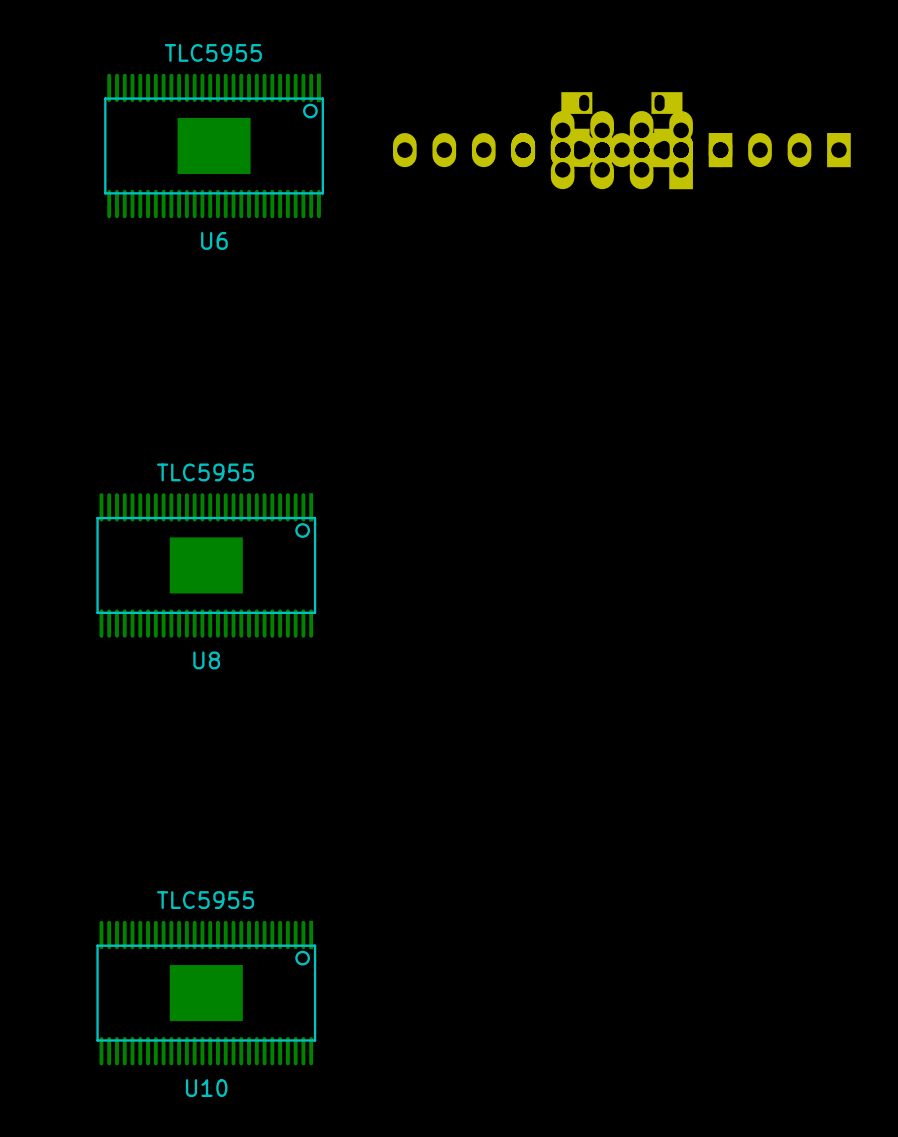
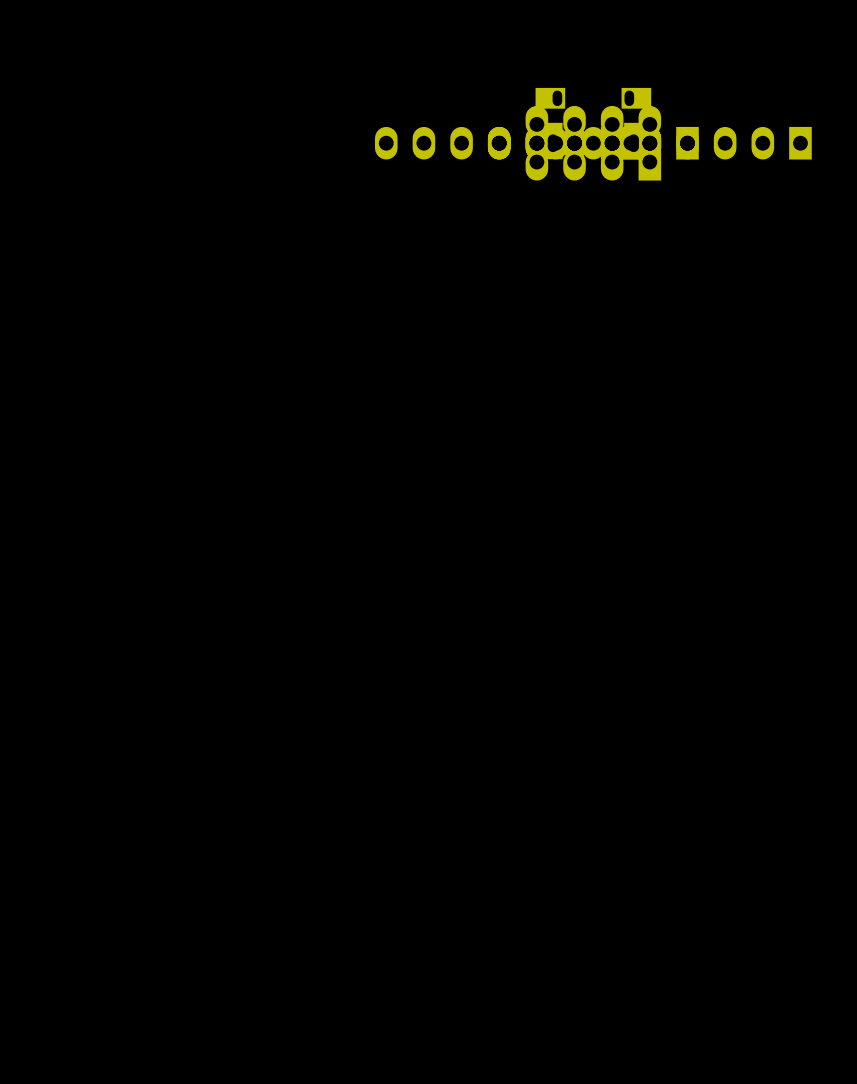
U6: TLC5955 (214, 145) -> none
U8: TLC5955 (206, 565) -> none
U10: TLC5955 (206, 993) -> none

